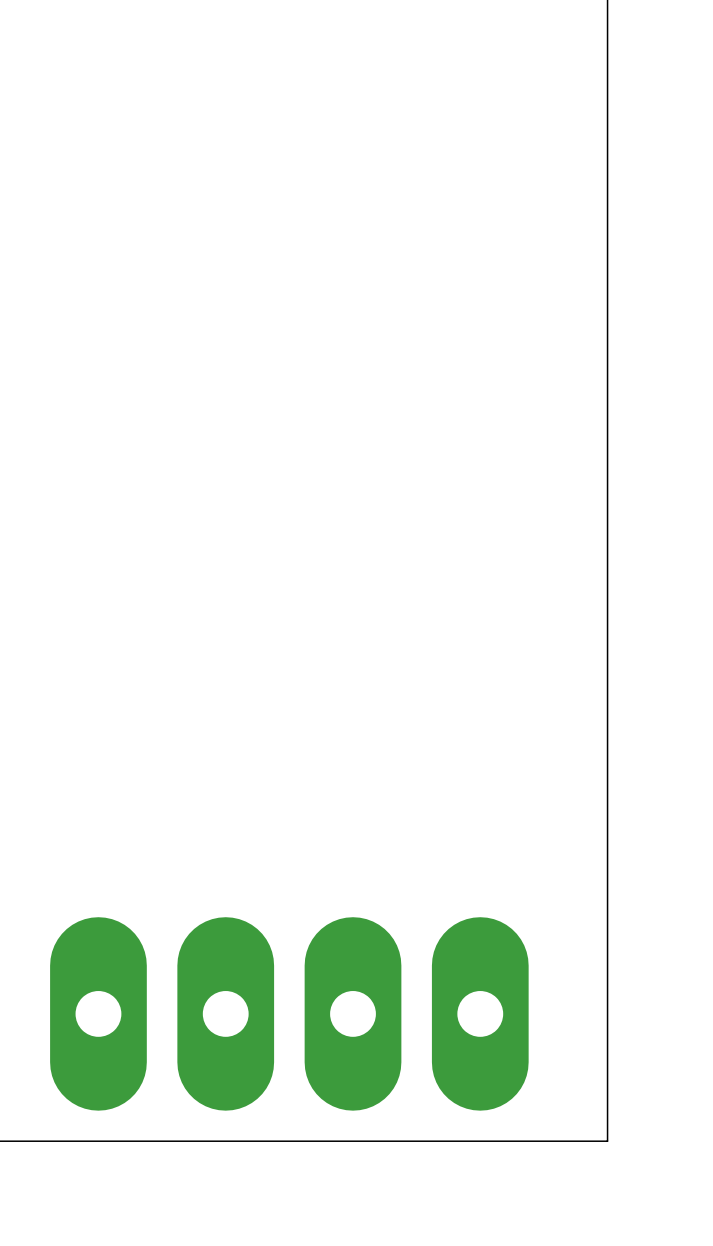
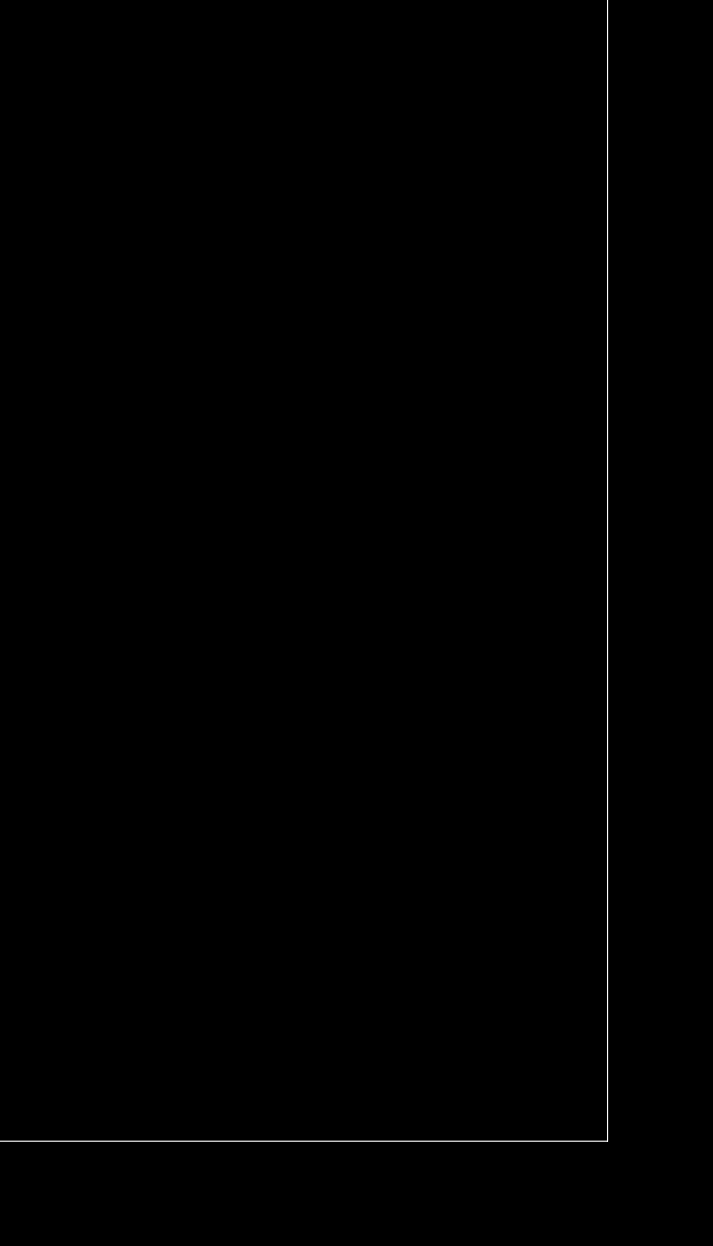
part: (289, 1013) -> none

